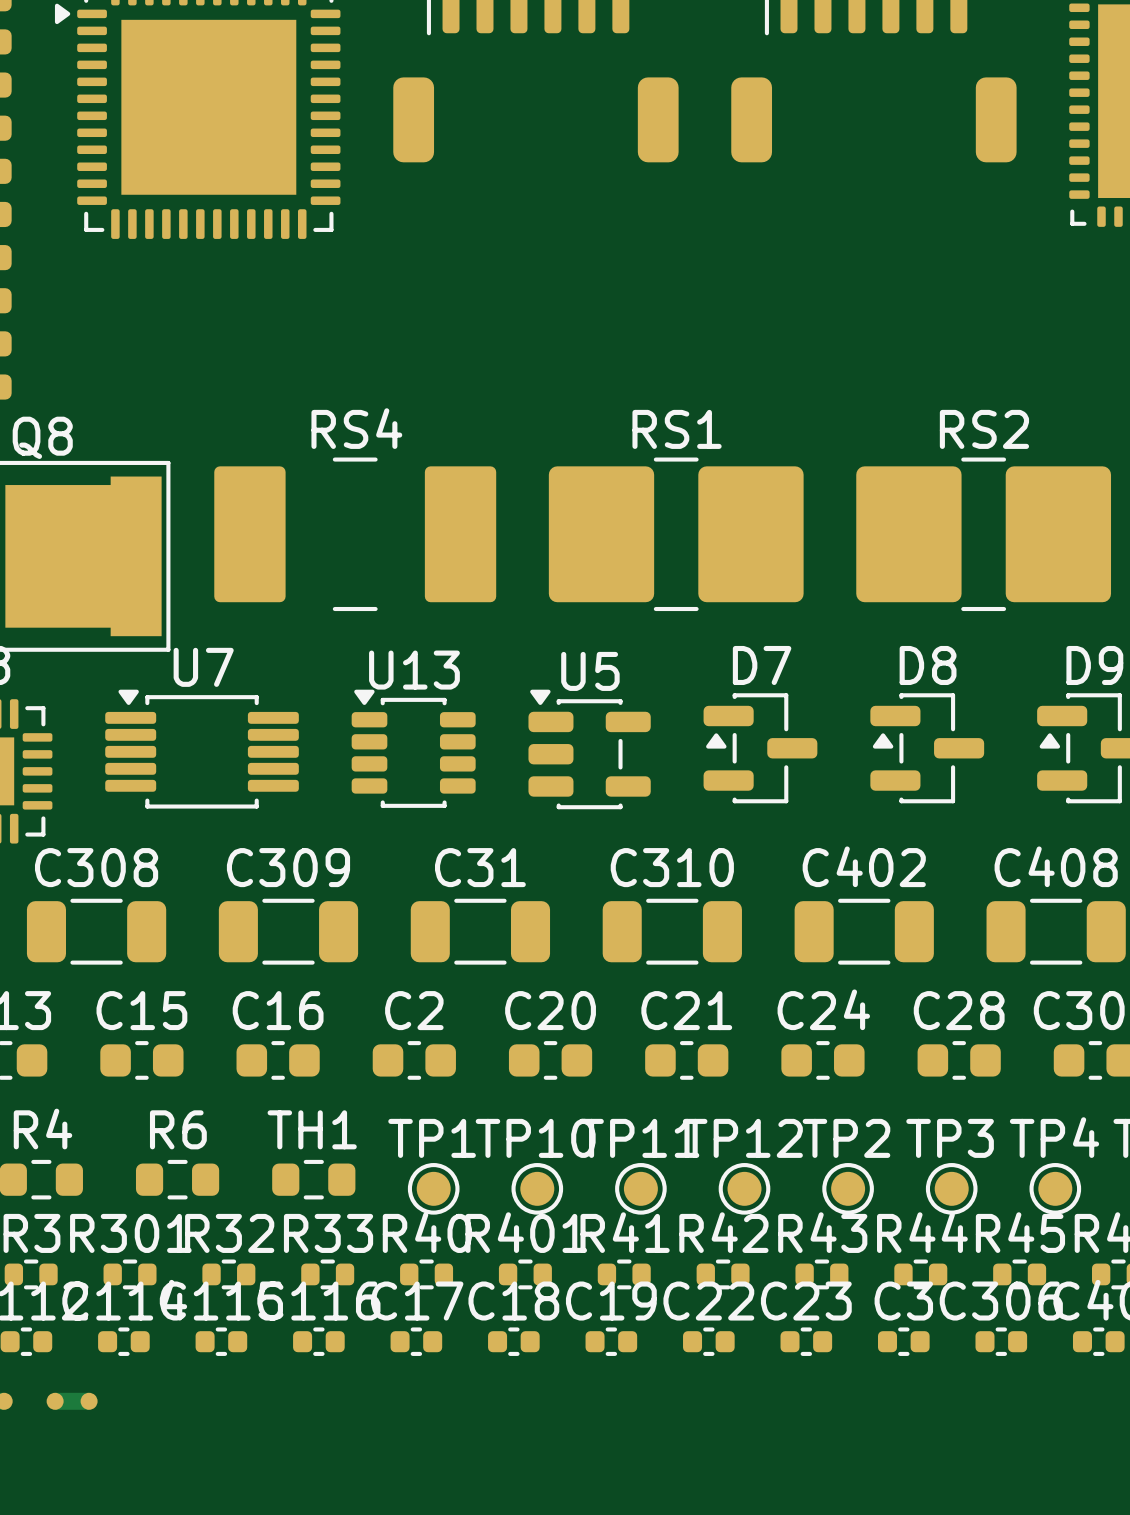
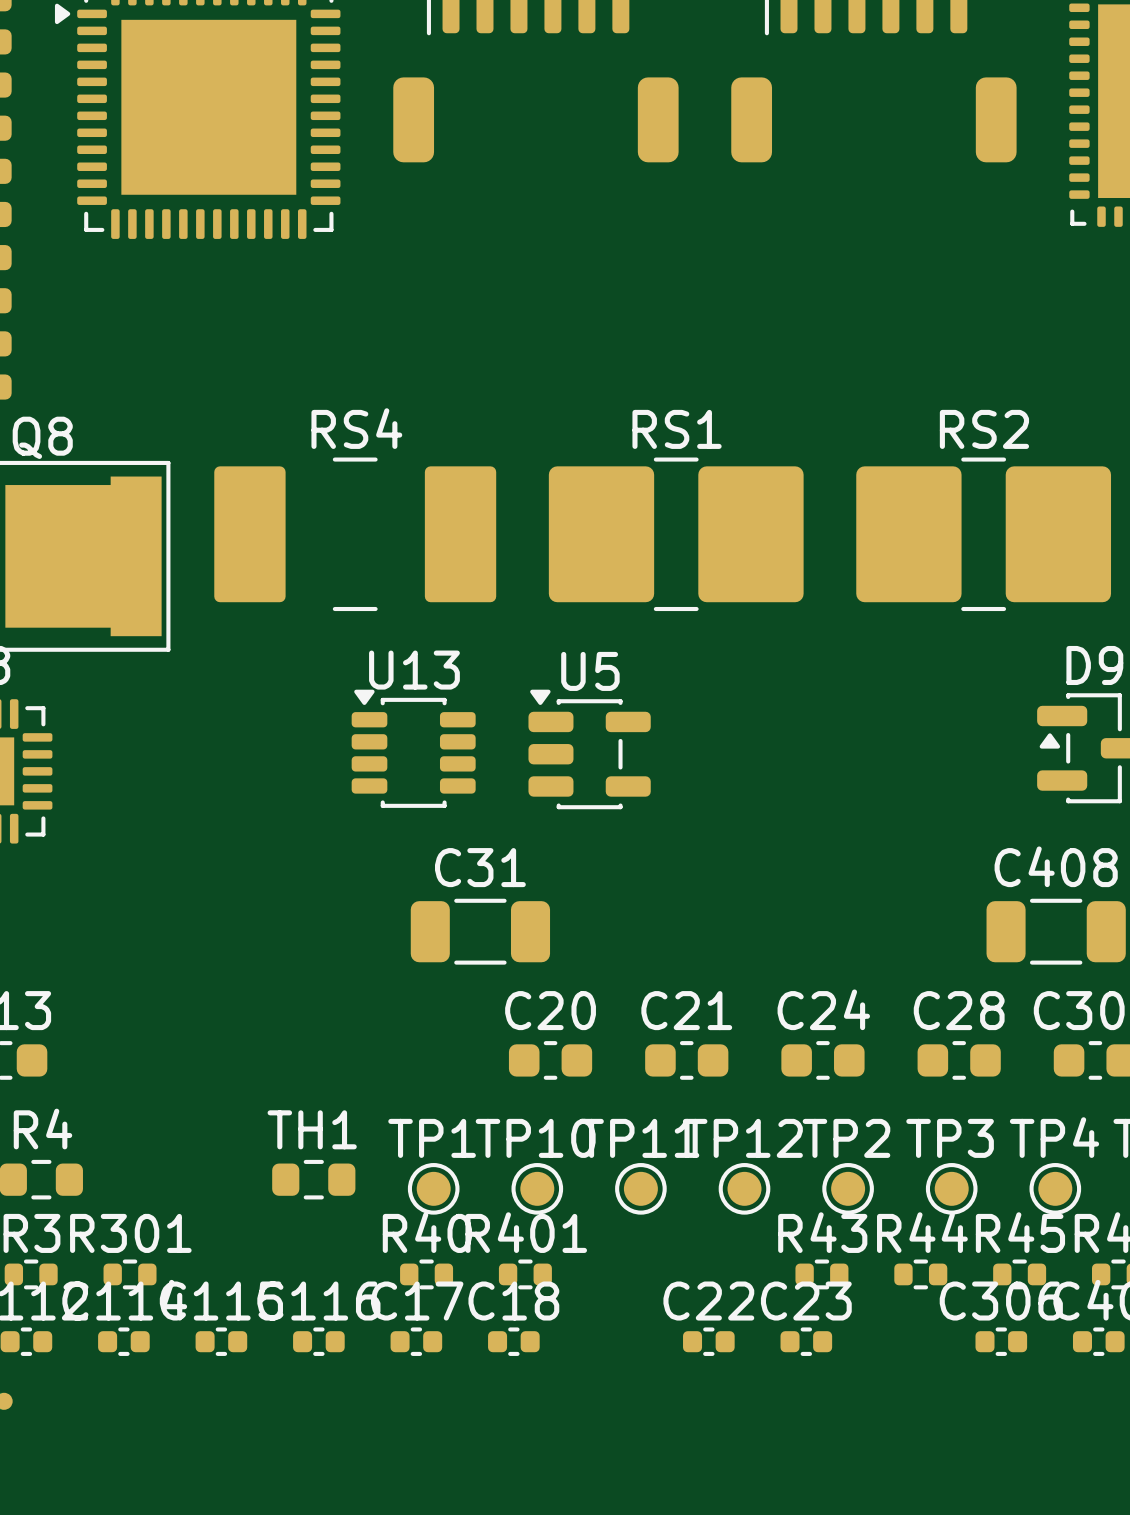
D7: (760, 748) -> none
D8: (927, 748) -> none
U7: (202, 749) -> none
C308: (96, 931) -> none
C309: (288, 931) -> none
C310: (672, 931) -> none
C402: (864, 931) -> none
C15: (141, 1060) -> none
C16: (278, 1060) -> none
C2: (414, 1060) -> none
R6: (177, 1179) -> none
R32: (228, 1274) -> none
R33: (327, 1274) -> none
R41: (624, 1274) -> none
R42: (723, 1274) -> none
C19: (611, 1341) -> none
C3: (903, 1341) -> none
part: (72, 1401) -> none

